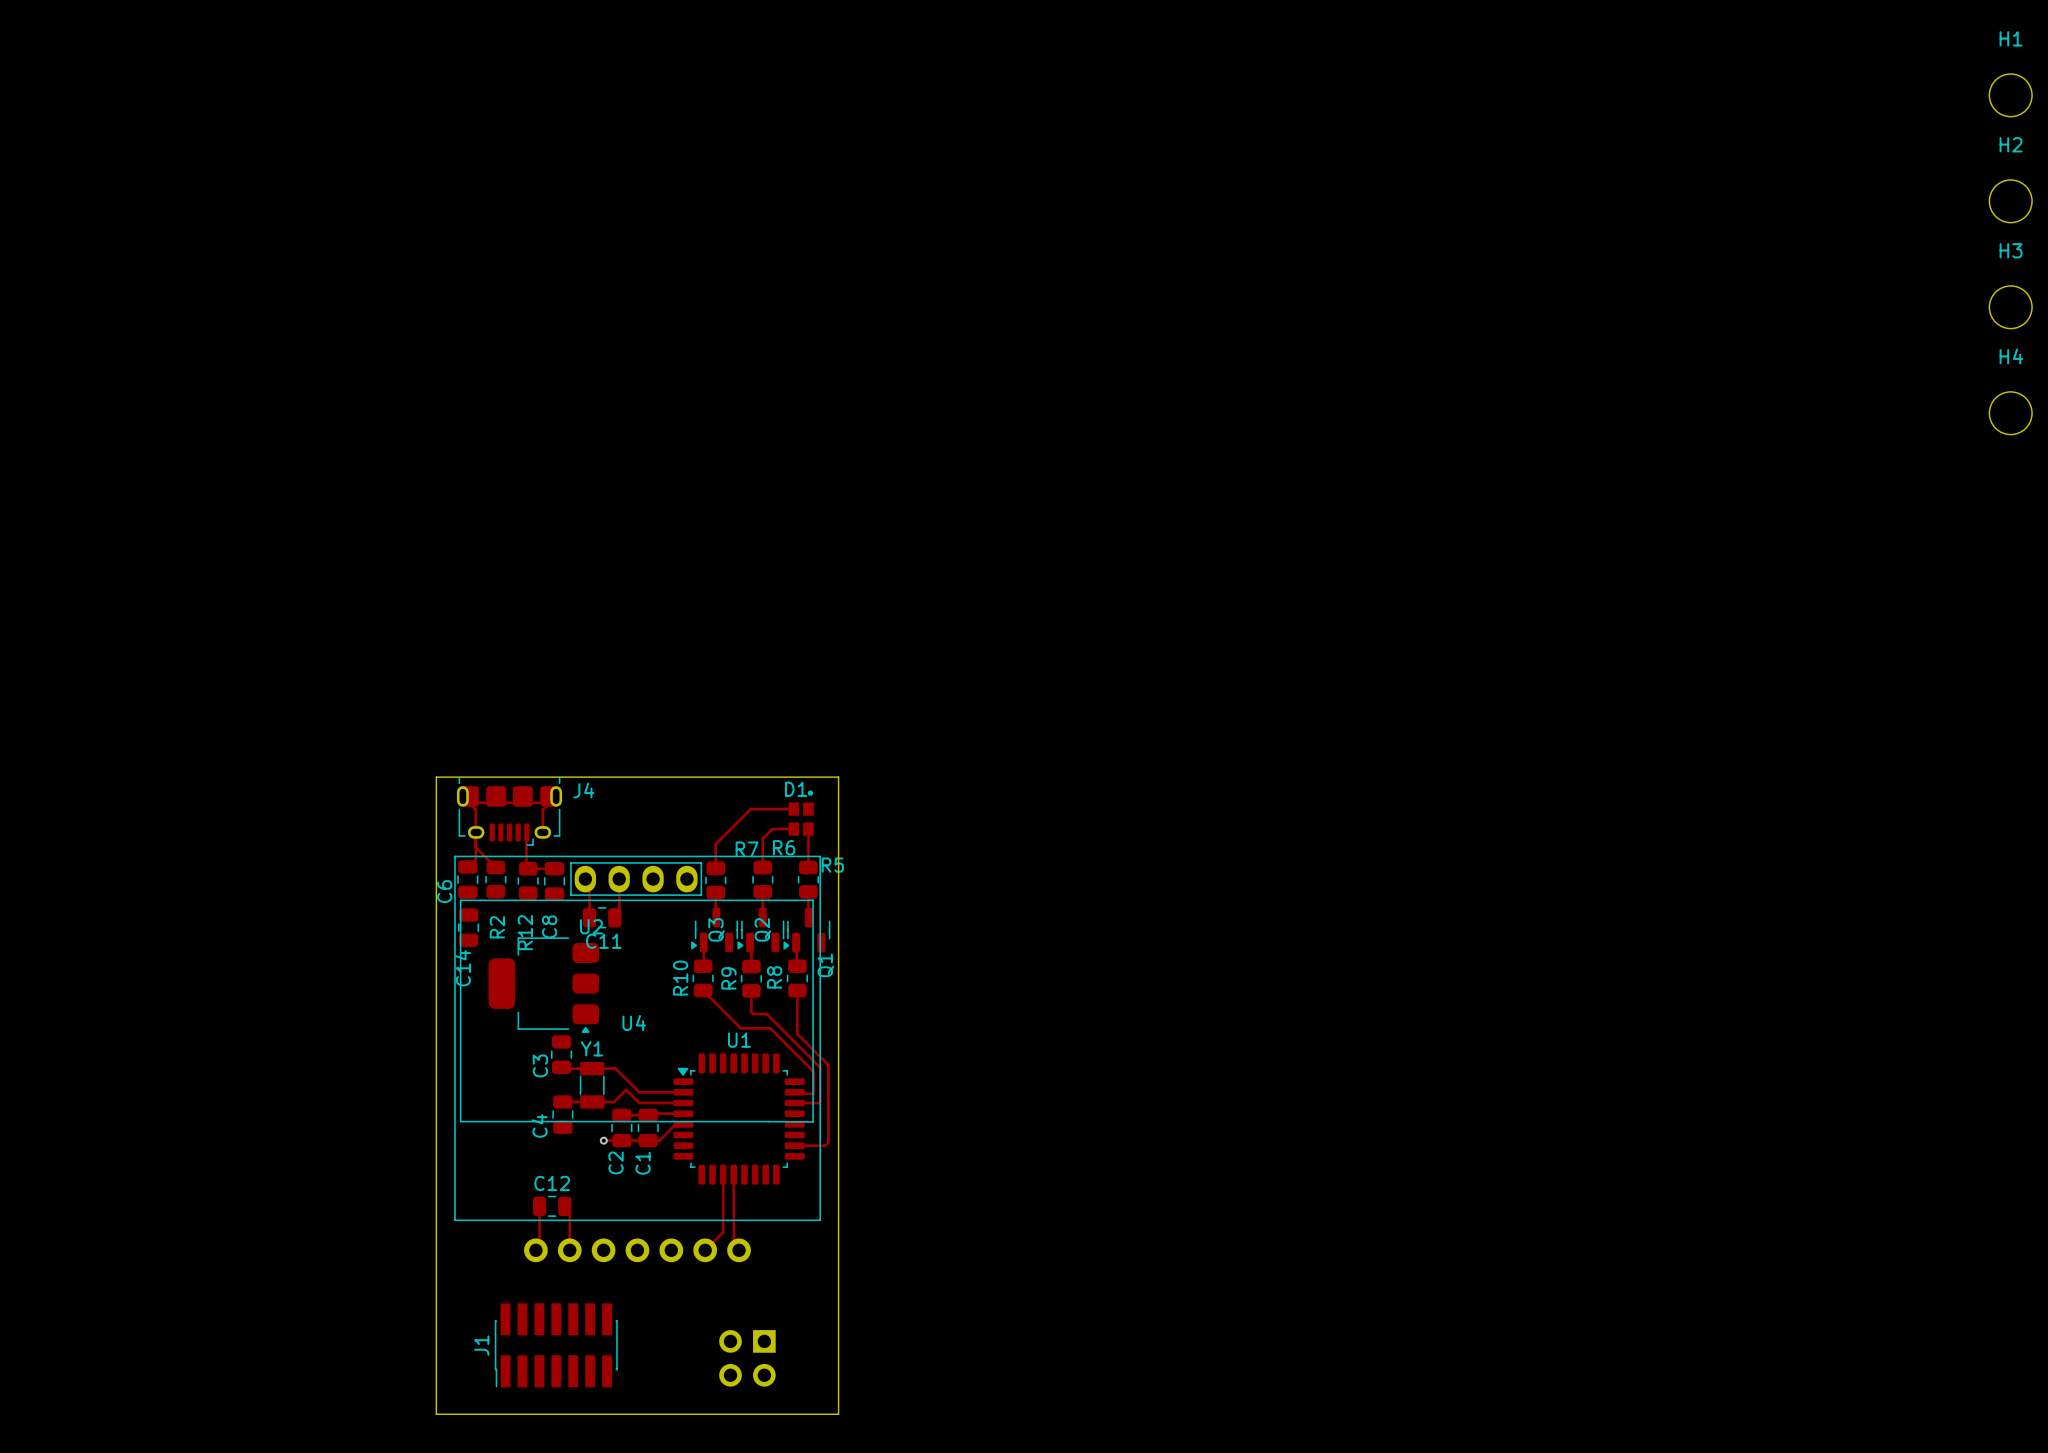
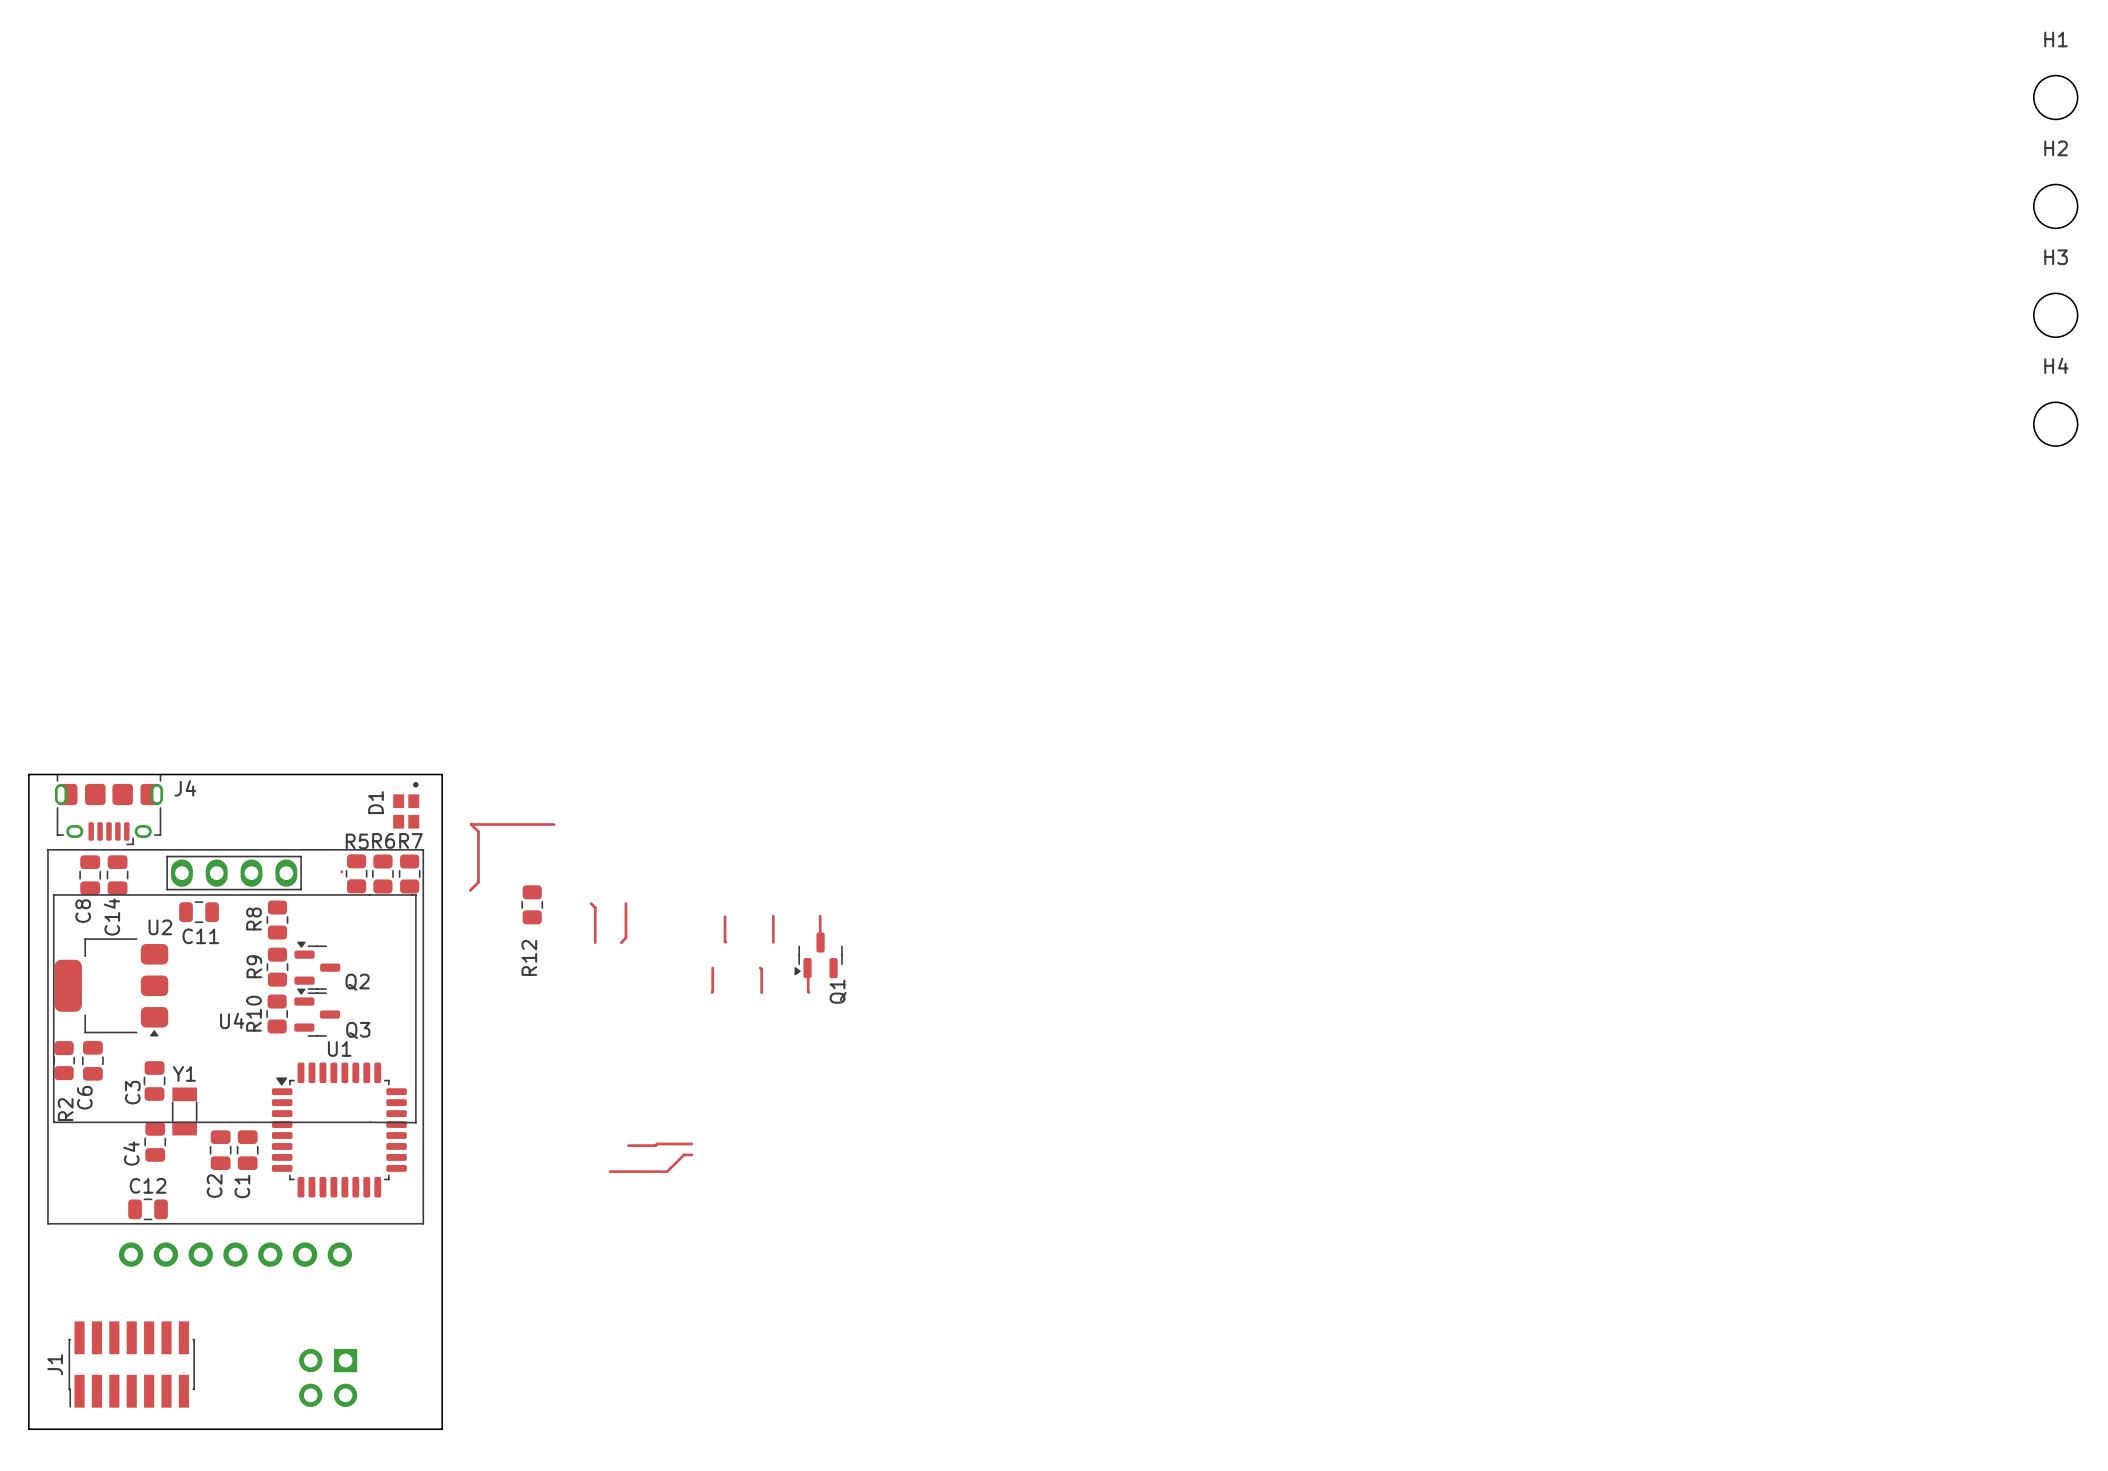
board edge: none -> (28, 774) (442, 774) (442, 1429) (28, 1429) (28, 774)
board edge: (436, 777) (838, 777) (838, 1414) (436, 1414) (436, 777) -> none
D1 name rotation: 0° (796, 789) -> 90° counterclockwise (375, 802)
track: (556, 796) (542, 809) (542, 832) -> none
track: (793, 809) (750, 809) (715, 844) (715, 868) -> none
J4 position: (509, 811) -> (108, 809)
D1 position: (801, 813) -> (406, 805)
track: (793, 829) (772, 829) (762, 838) (762, 867) -> none
track: (808, 829) (808, 867) -> none
track: (526, 838) (526, 867) (528, 868) (554, 868) -> none
track: (475, 847) (495, 867) -> none
R6 name position: R6 (784, 847) -> R6 (383, 840)
track: none -> (341, 871) (341, 872)
R7 name position: R7 (747, 849) -> R7 (410, 840)
R5 name position: R5 (832, 865) -> R5 (357, 841)
C6 position: (467, 879) -> (92, 1060)
R2 position: (495, 879) -> (64, 1060)
R6 position: (762, 879) -> (382, 873)
R5 position: (808, 879) -> (356, 873)
R7 position: (715, 880) -> (409, 873)
C8 position: (554, 881) -> (90, 875)
C6 name position: C6 (444, 891) -> C6 (84, 1097)
C11 position: (602, 917) -> (199, 912)
C8 name position: C8 (549, 926) -> C8 (83, 911)
C14 position: (468, 927) -> (117, 875)
Q3 rotation: 0° (714, 929) -> 90° clockwise (317, 1012)
Q3 position: (714, 929) -> (317, 1012)
Q3 name position: Q3 (716, 929) -> Q3 (358, 1030)
Q2 rotation: 0° (760, 929) -> 90° clockwise (317, 965)
Q2 position: (760, 929) -> (317, 965)
Q2 name position: Q2 (762, 929) -> Q2 (357, 982)
R10 position: (703, 978) -> (277, 1014)
R9 position: (751, 978) -> (277, 967)
R8 position: (797, 978) -> (277, 920)
U2 position: (543, 985) -> (111, 987)
track: (703, 990) (740, 1028) (770, 1028) (813, 1071) (813, 1093) (794, 1092) -> none
track: (751, 990) (751, 1012) (753, 1014) (766, 1014) (820, 1067) (820, 1102) (794, 1103) -> none
track: (797, 990) (797, 1034) -> none
track: (797, 1034) (828, 1065) (828, 1142) (825, 1146) -> none
U4 position: (637, 1038) -> (235, 1036)
C3 position: (561, 1054) -> (154, 1080)
track: (561, 1067) (614, 1067) (639, 1092) (683, 1092) -> none
Y1 position: (592, 1085) -> (184, 1111)
track: (562, 1101) (614, 1101) (626, 1089) (639, 1103) (683, 1103) -> none
C4 position: (562, 1114) -> (155, 1141)
U1 position: (739, 1119) -> (339, 1130)
C2 position: (621, 1127) -> (220, 1150)
C1 position: (648, 1127) -> (247, 1150)
via: (603, 1140) -> none
track: (794, 1145) (824, 1146) -> none
track: (723, 1174) (723, 1232) (705, 1250) -> none
track: (733, 1174) (733, 1245) (739, 1250) -> none
track: (539, 1206) (539, 1246) (535, 1250) -> none
C12 position: (552, 1206) -> (148, 1209)
track: (564, 1206) (569, 1211) (569, 1250) -> none
part: none -> (235, 1254)
part: (637, 1250) -> none
part: none -> (328, 1377)
J1 position: (556, 1345) -> (131, 1364)
part: (747, 1358) -> none

